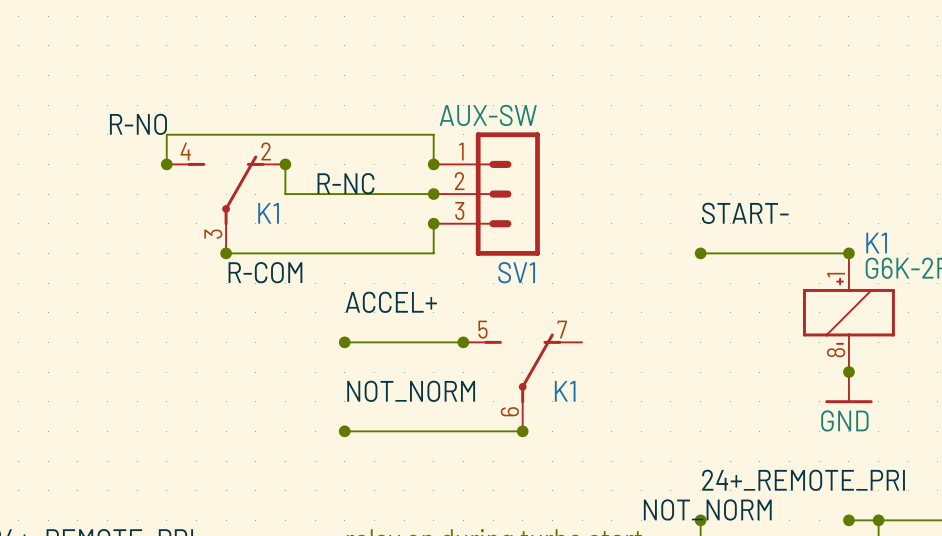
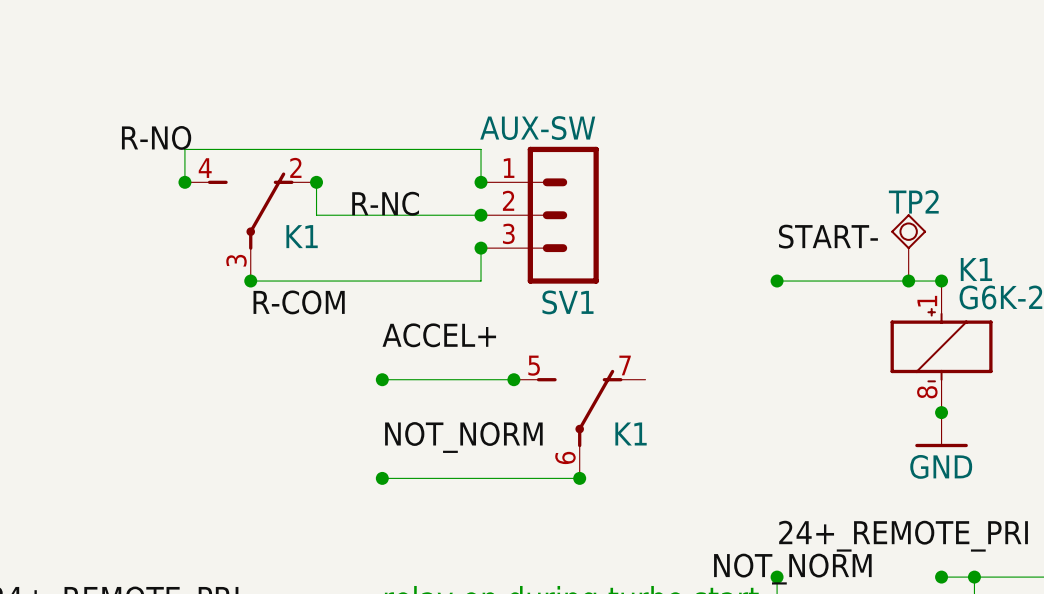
TP2: none -> (908, 247)
junction: none -> (908, 281)

